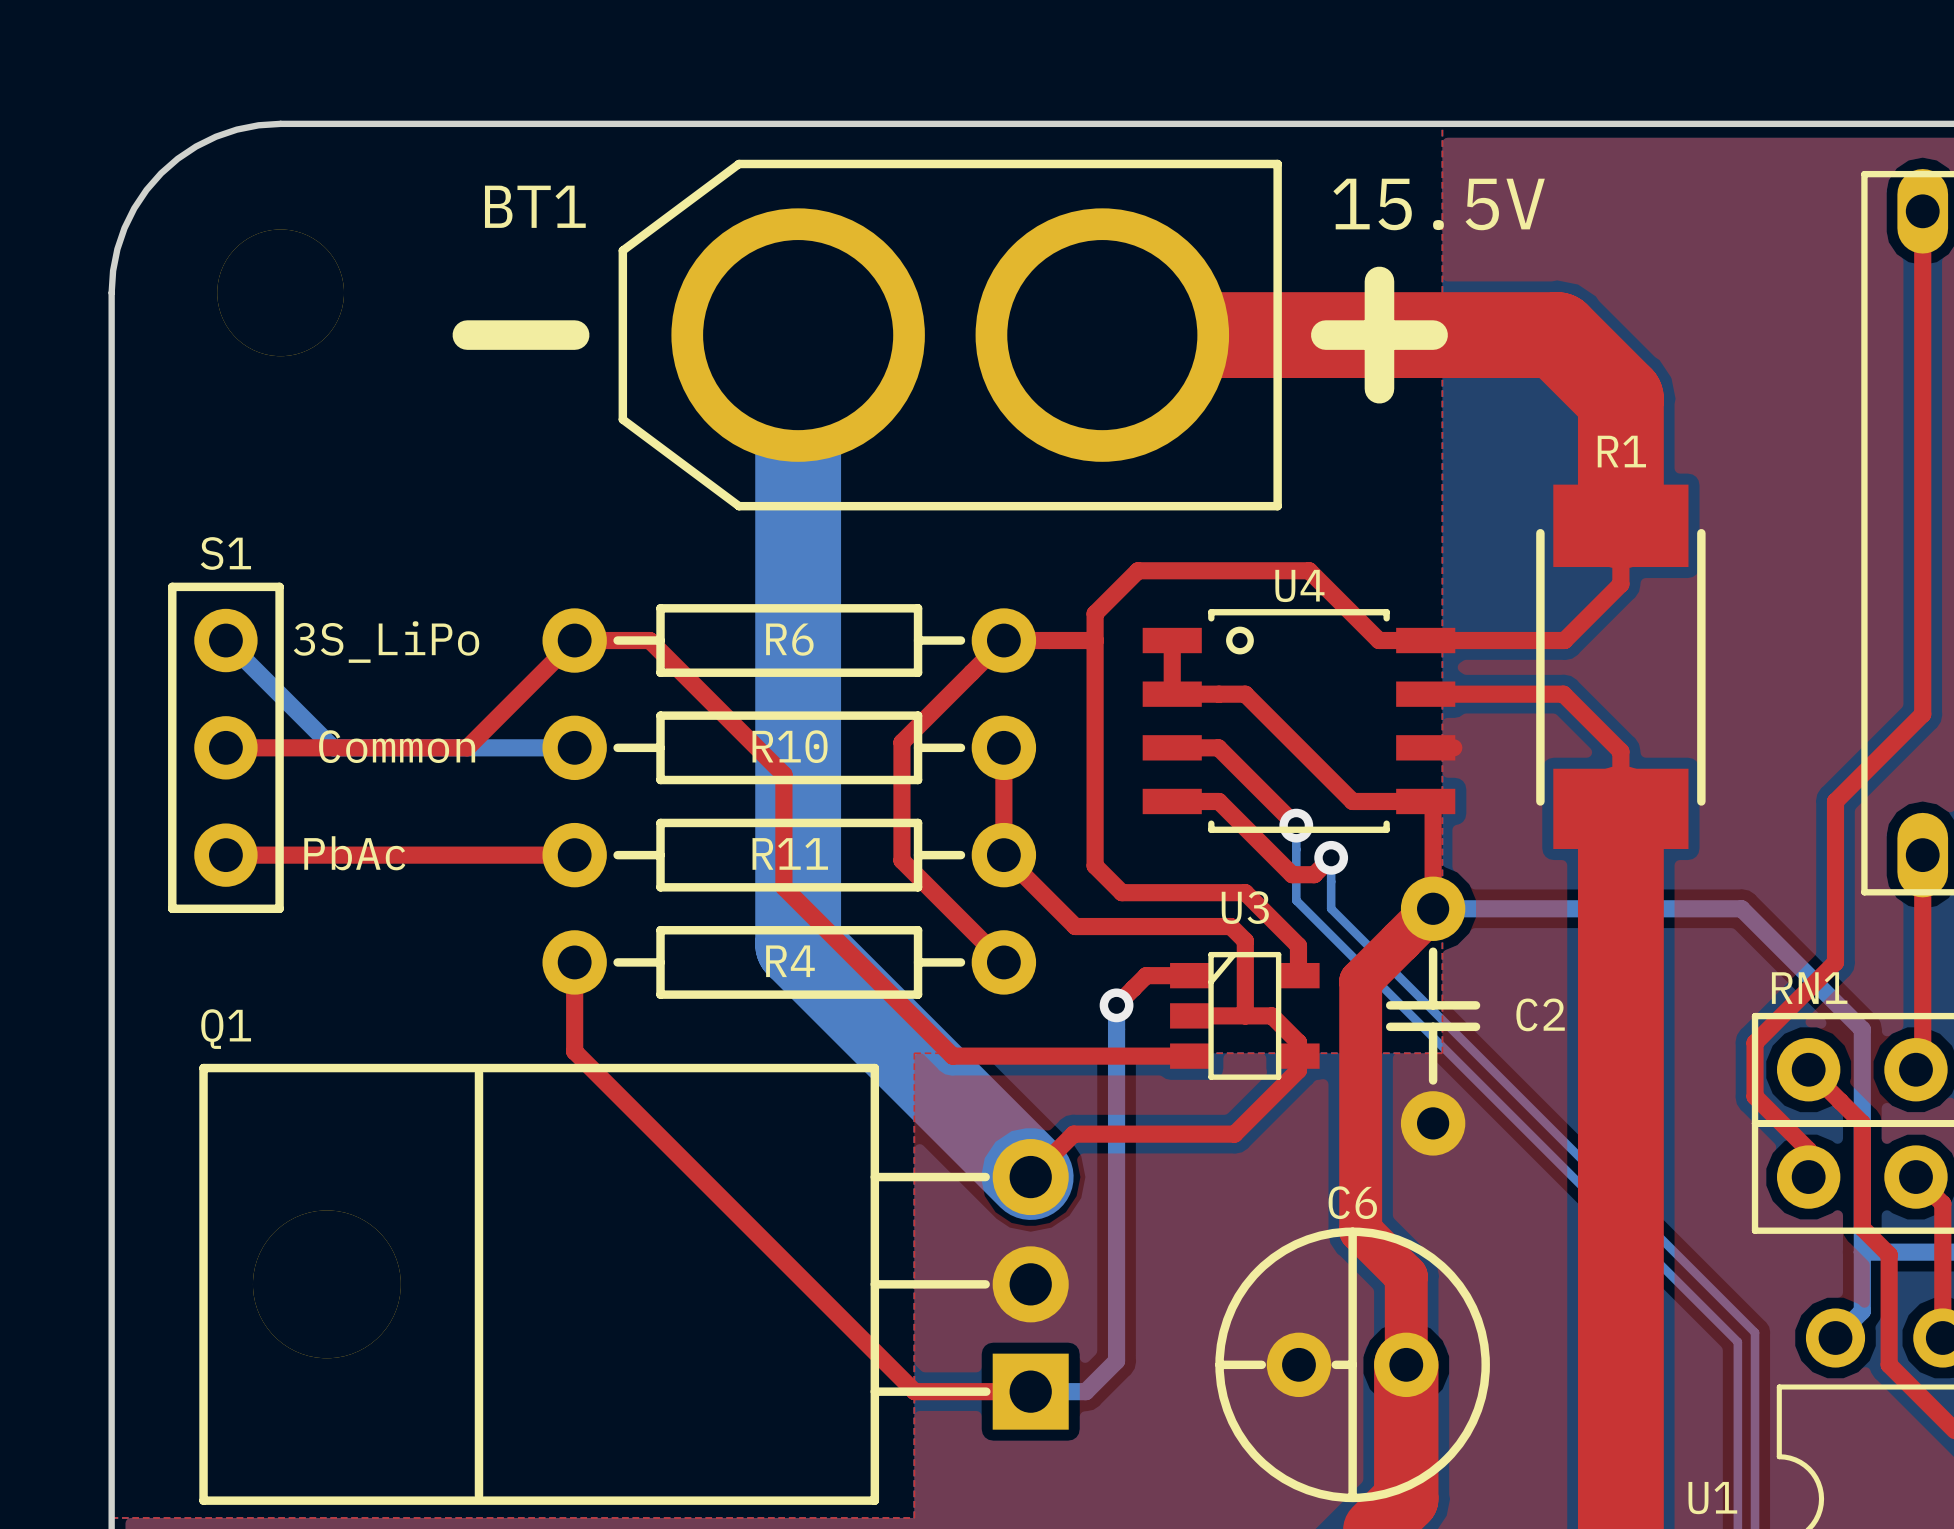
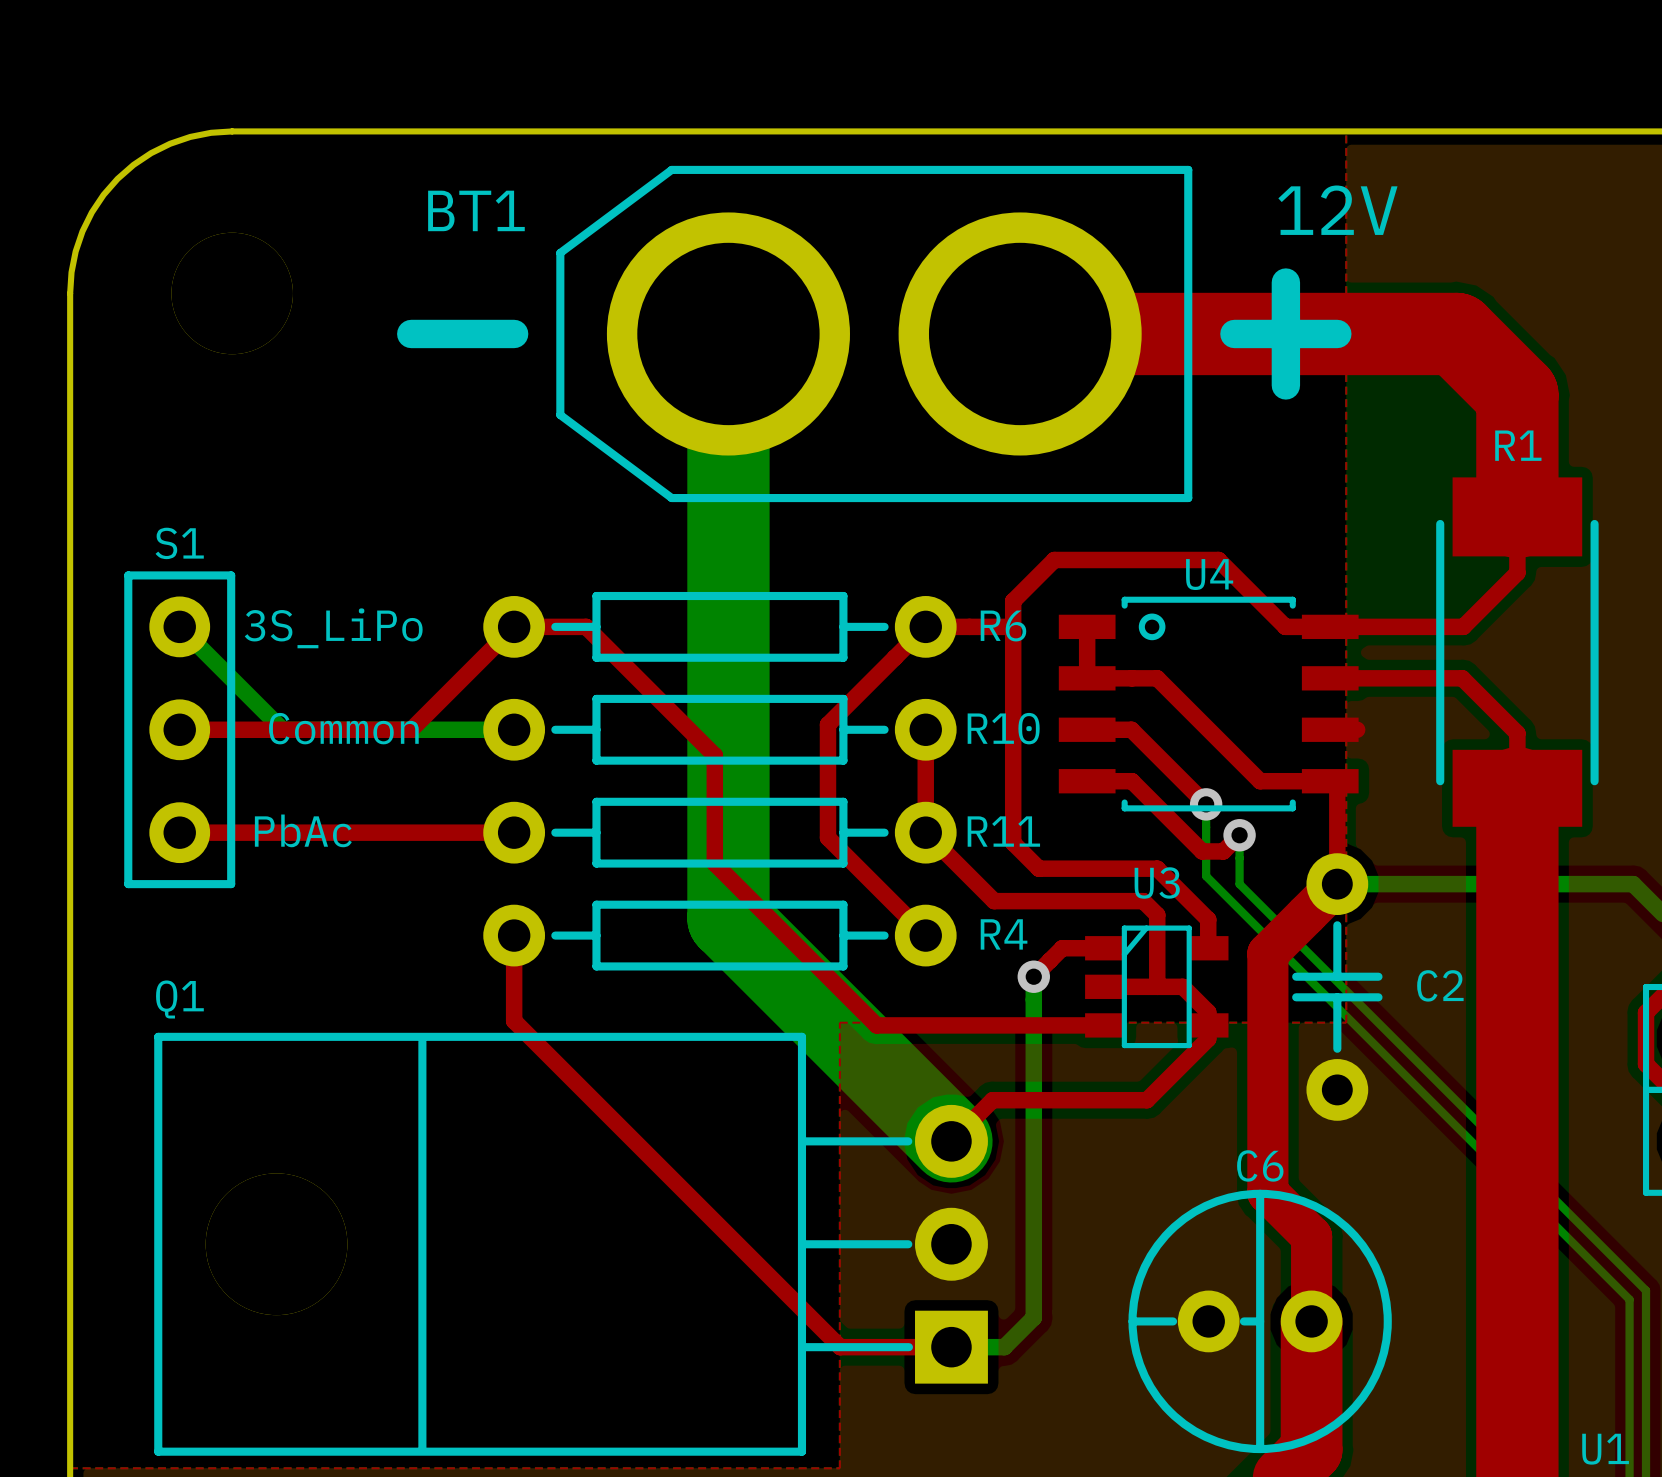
BT1 value: 15.5V (1439, 204) -> 12V (1337, 210)
R6 name position: R6 (789, 639) -> R6 (1003, 626)
R10 name position: R10 (790, 746) -> R10 (1003, 728)
R11 name position: R11 (790, 853) -> R11 (1003, 831)
R4 name position: R4 (790, 961) -> R4 (1004, 934)

